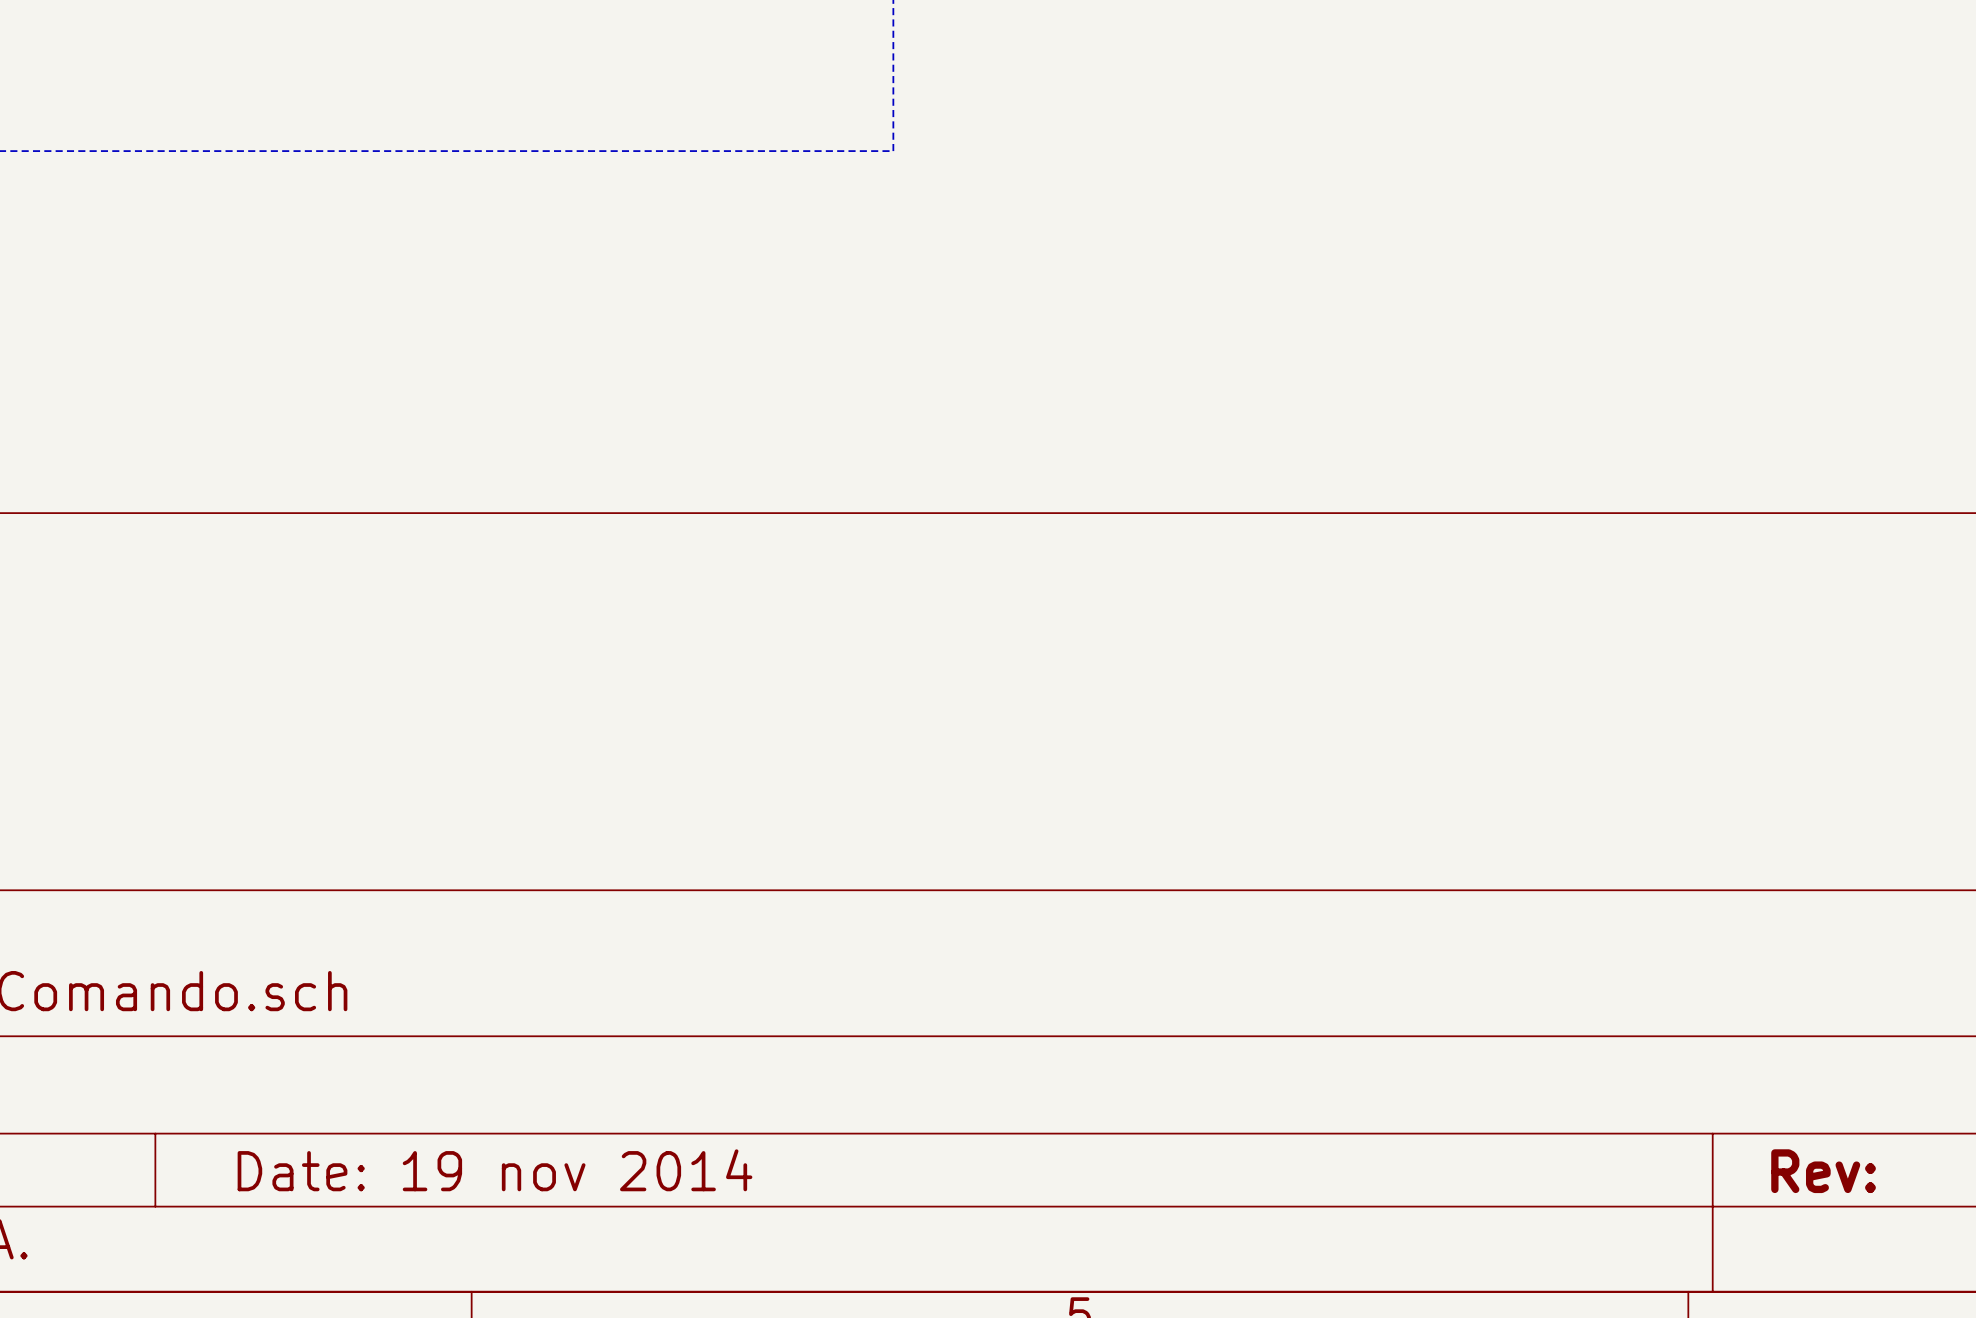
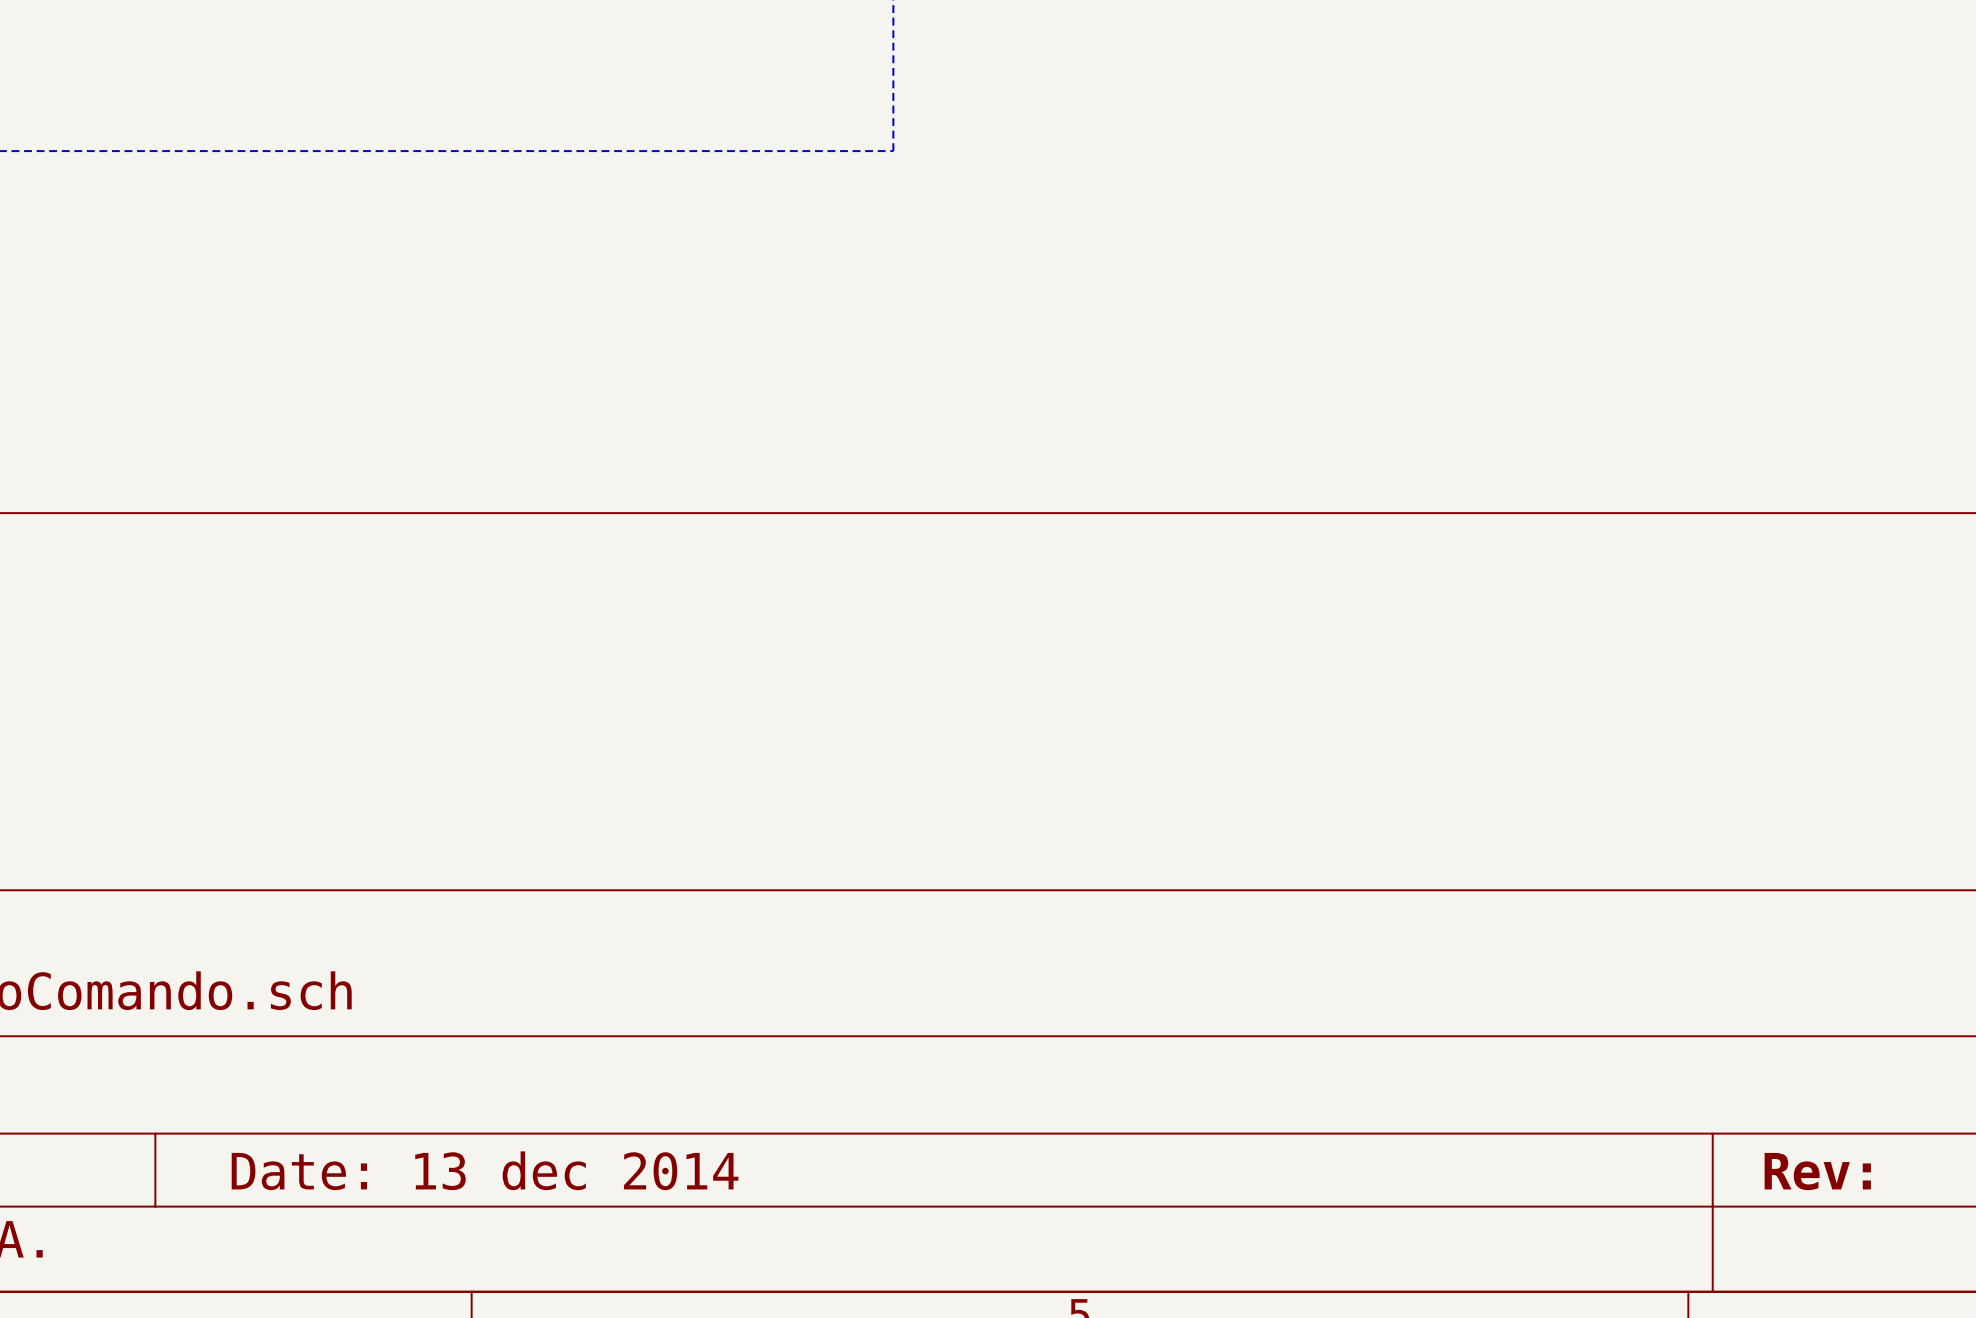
title block: Date: 19 nov 2014 (495, 1170) -> Date: 13 dec 2014 (485, 1170)

